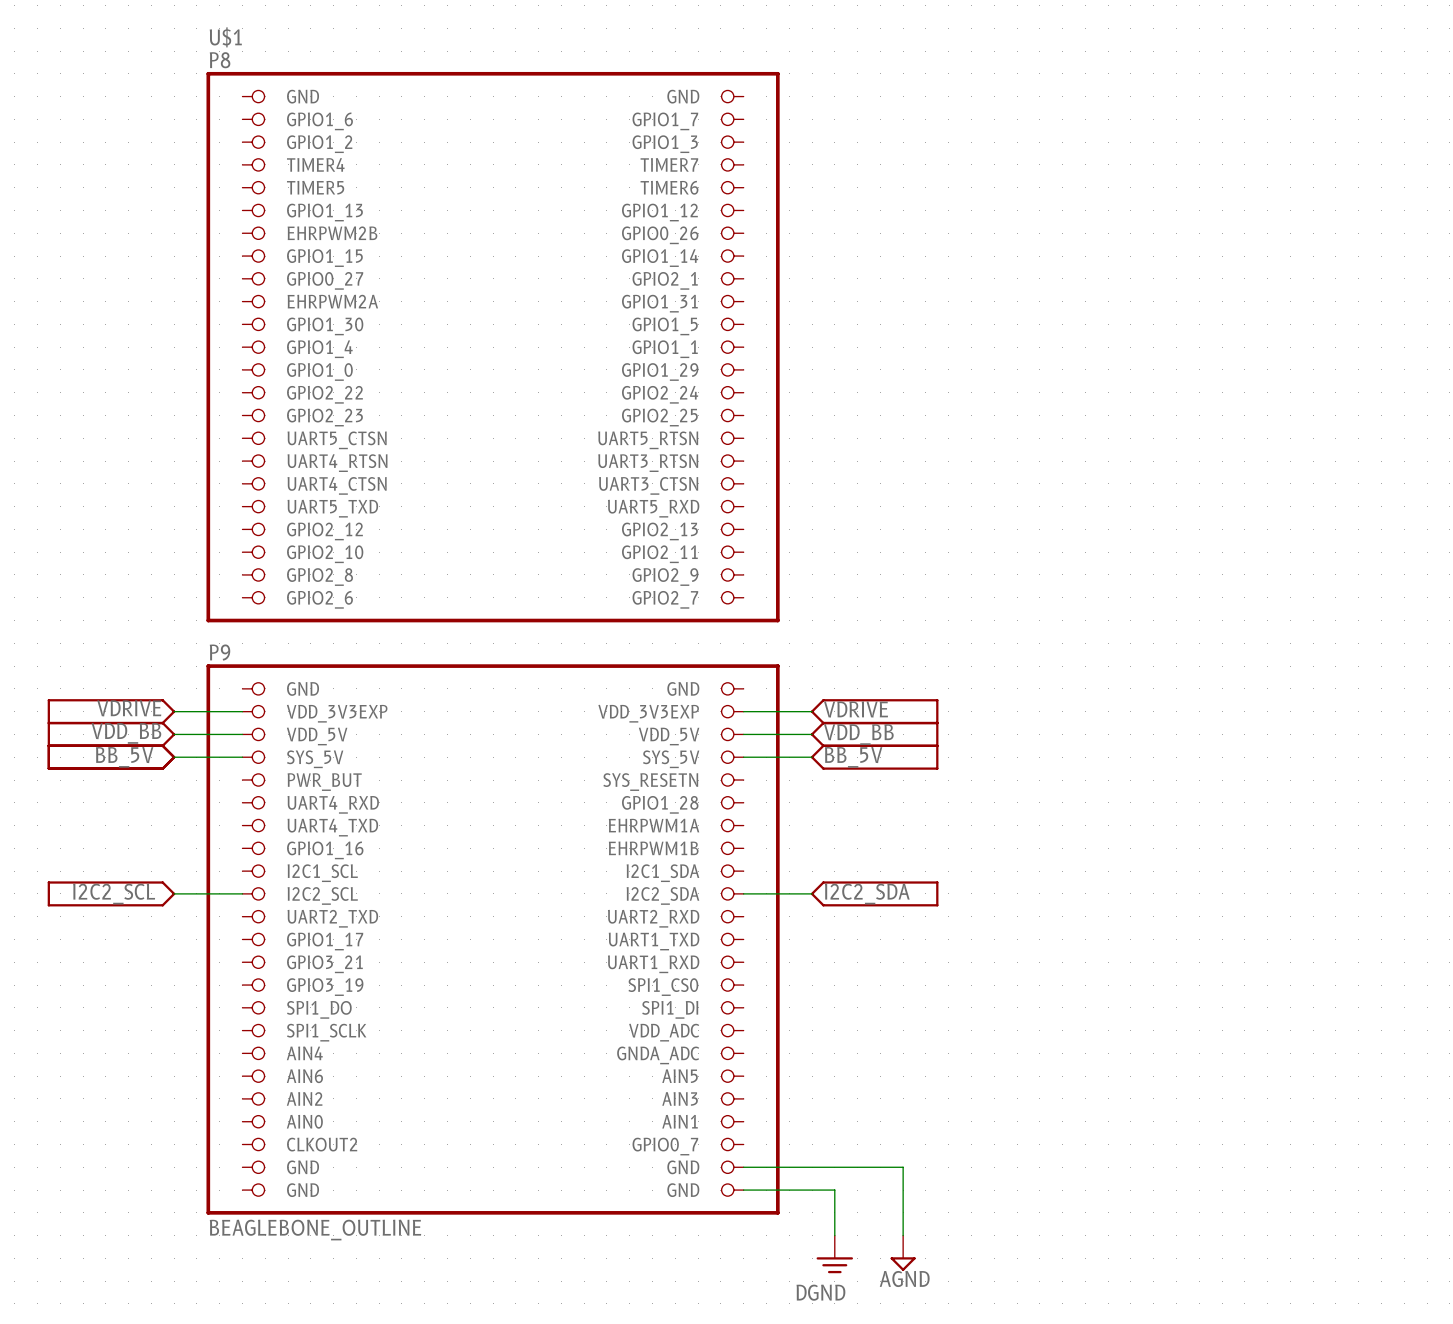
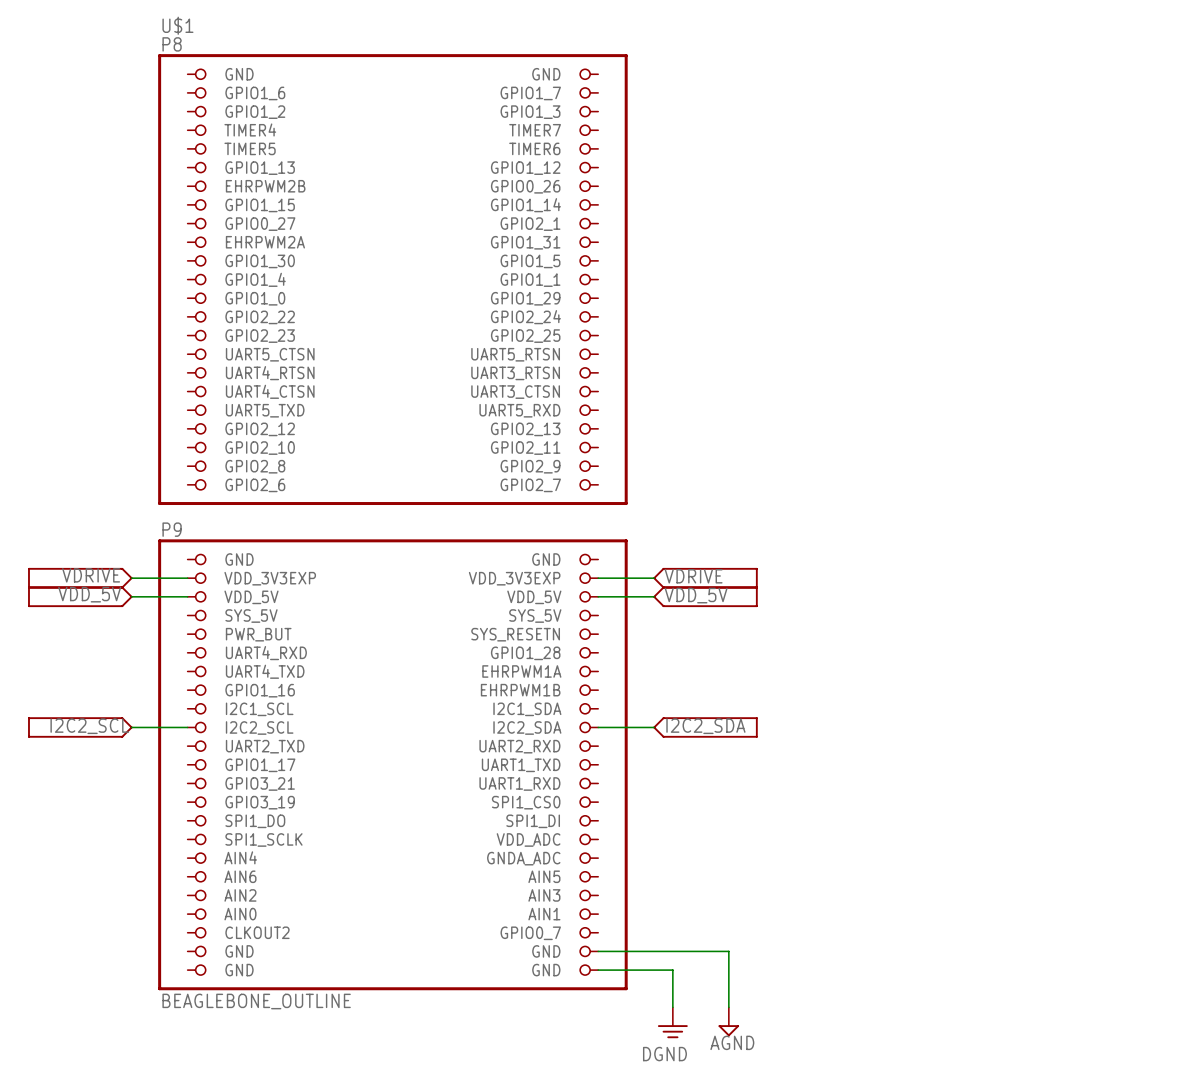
label: VDD_BB (126, 733) -> VDD_5V (89, 594)
label: VDD_BB (858, 734) -> VDD_5V (696, 595)
part: (111, 757) -> none
label: BB_5V (124, 757) -> none
wire: (174, 757) (242, 757) -> none
wire: (743, 757) (812, 757) -> none
label: BB_5V (853, 757) -> none
part: (874, 757) -> none

